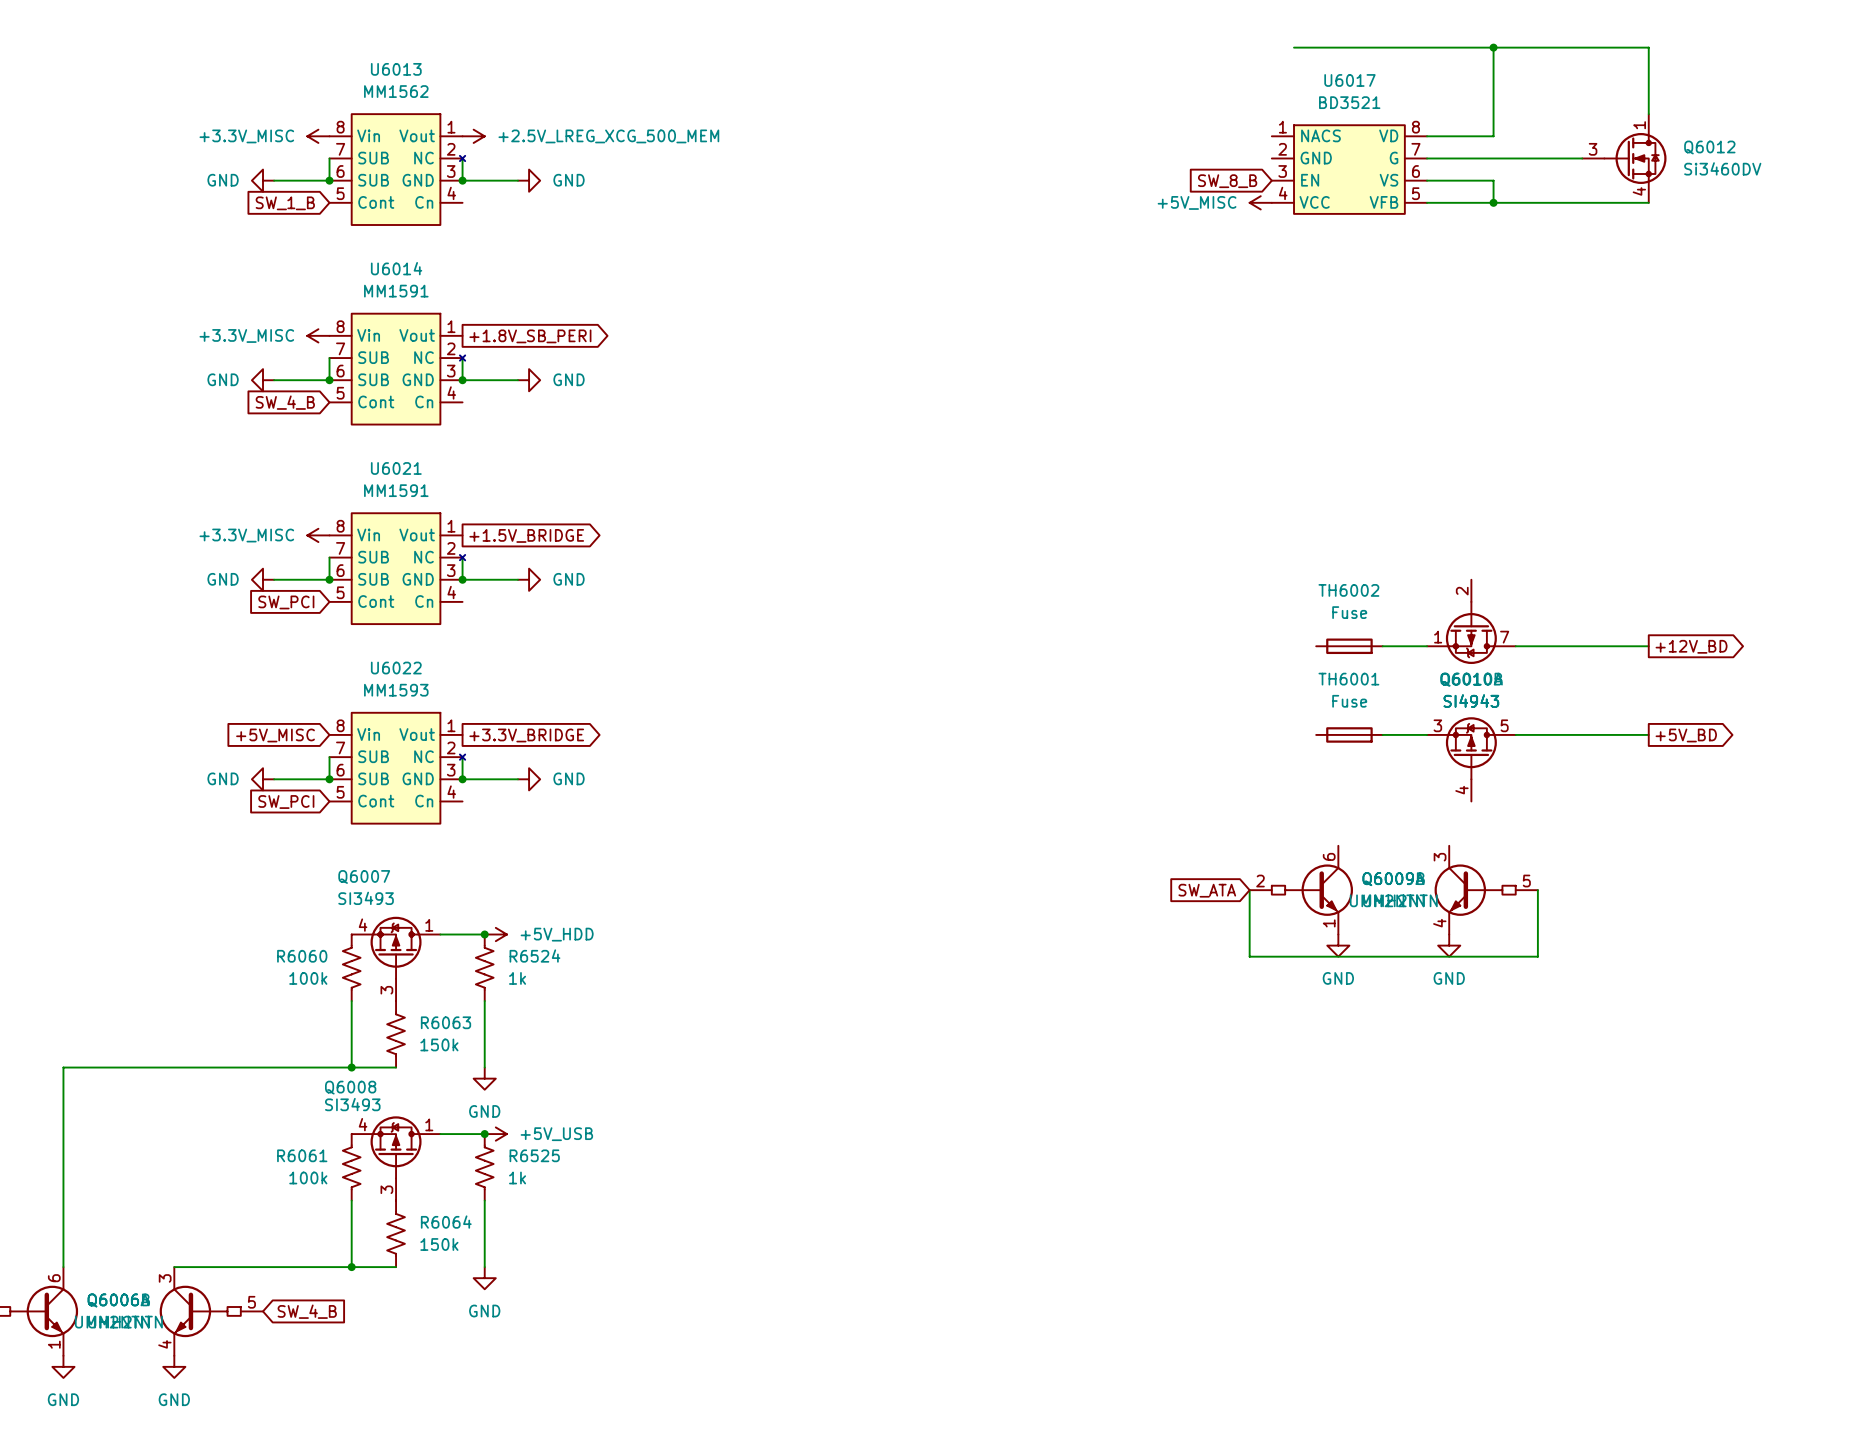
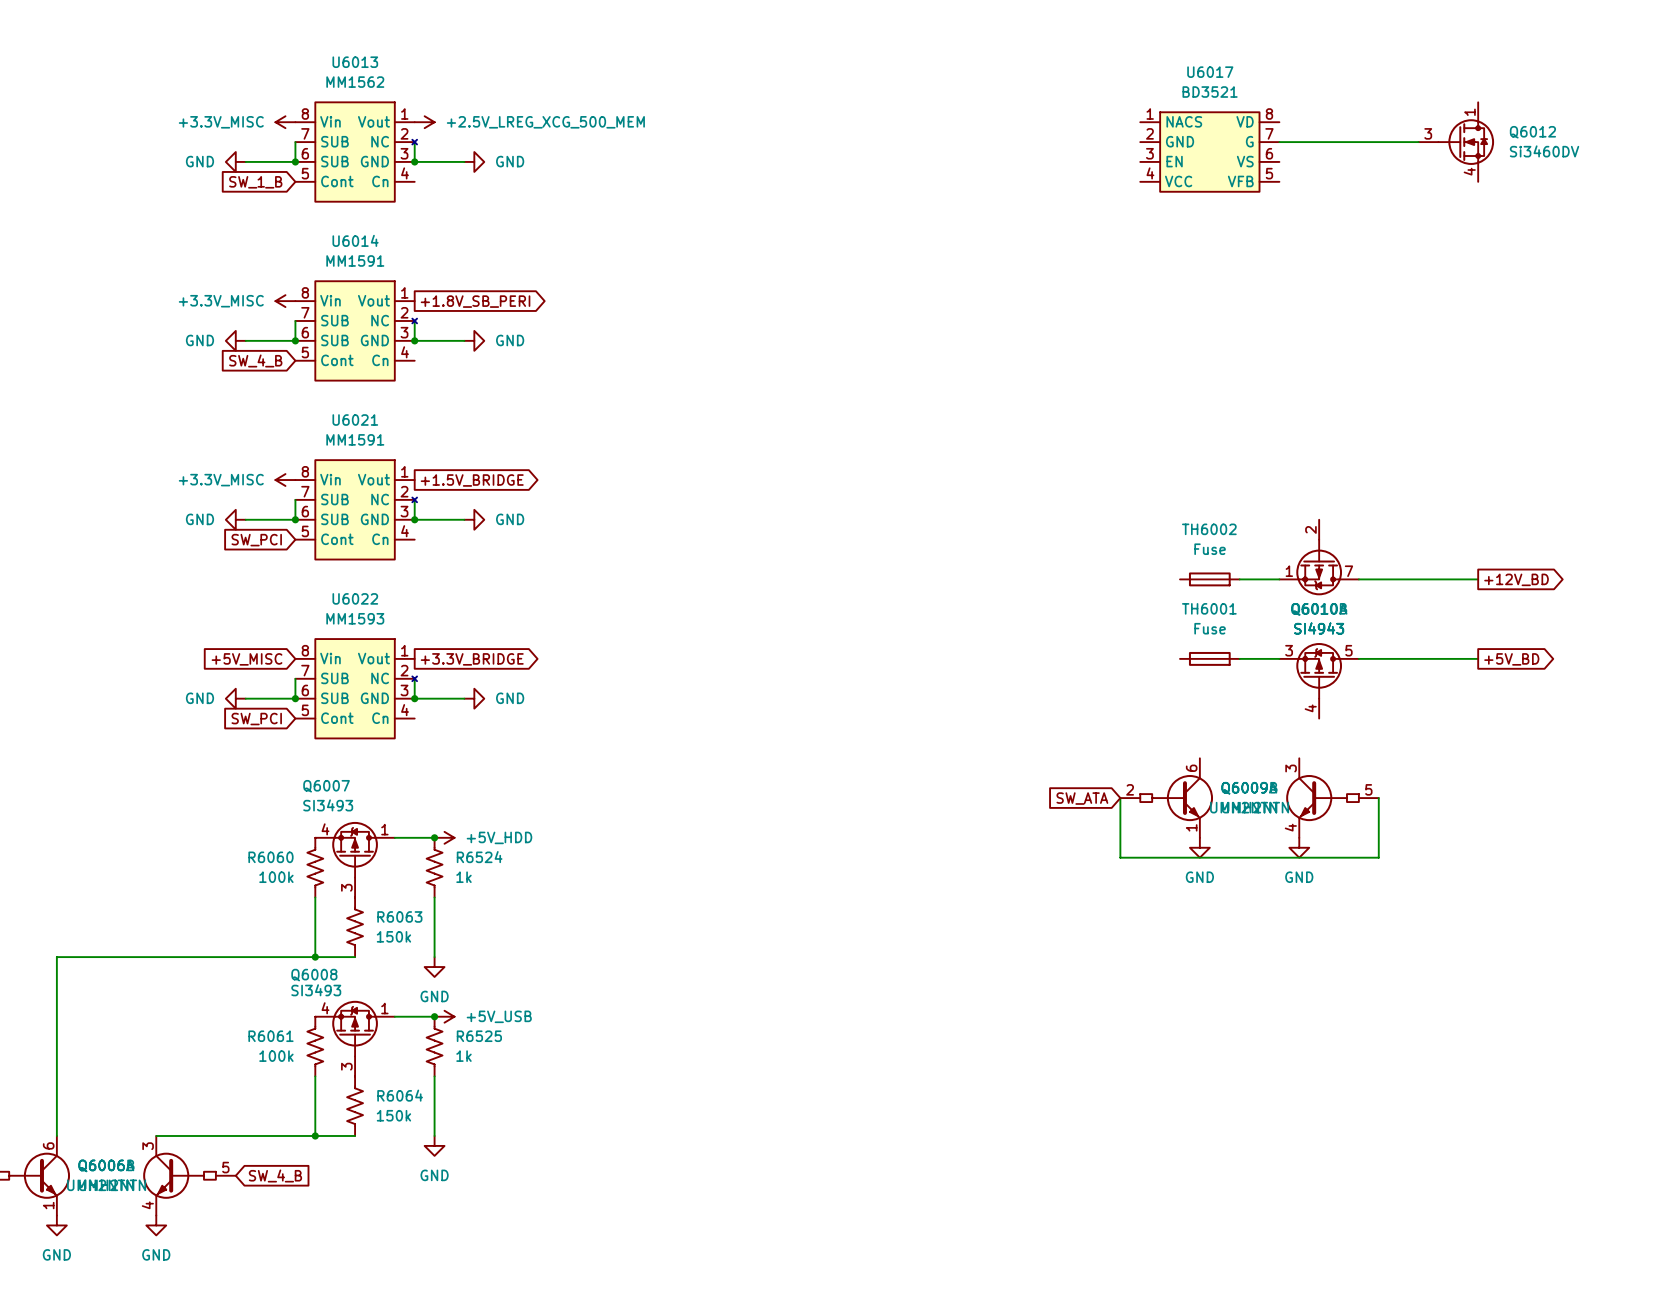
wire: (1294, 47) (1648, 47) (1648, 114) -> none
wire: (1493, 47) (1493, 136) (1427, 136) -> none
junction: (1493, 47) -> none
wire: (1427, 180) (1493, 180) (1493, 202) -> none
global label: SW_8_B (1227, 181) -> none
power symbol: +5V_MISC (1260, 202) -> none
wire: (1427, 202) (1648, 202) -> none
junction: (1493, 202) -> none

